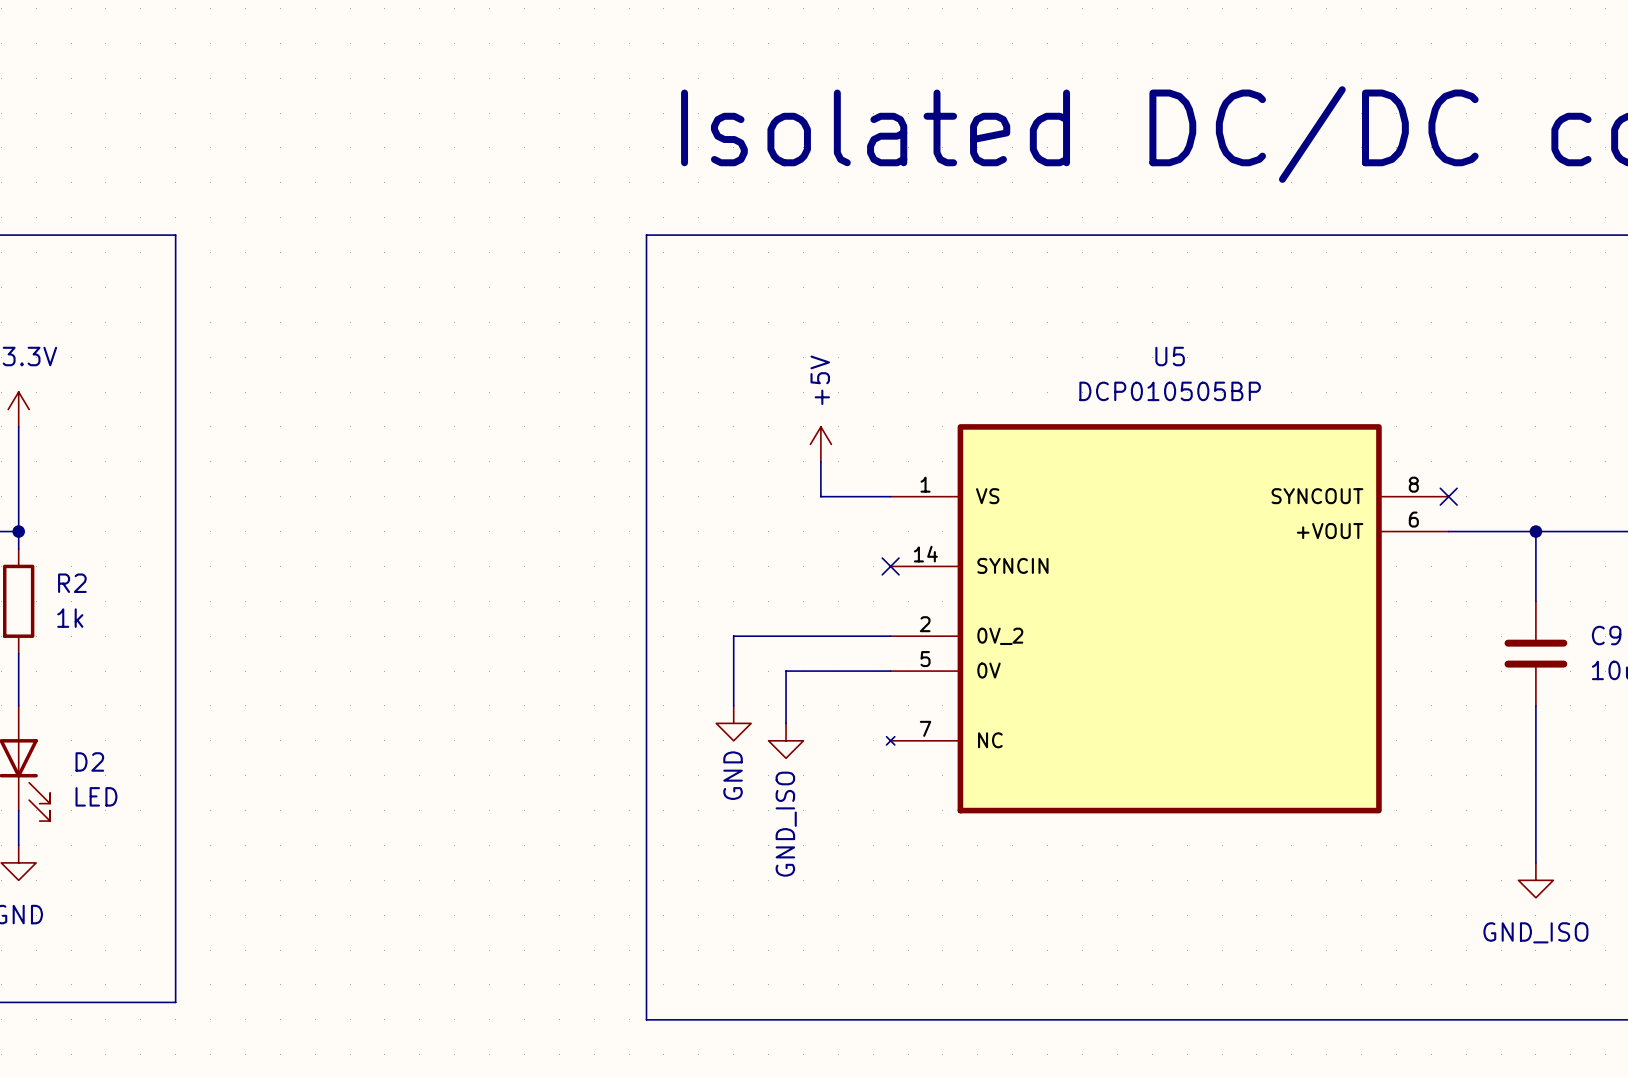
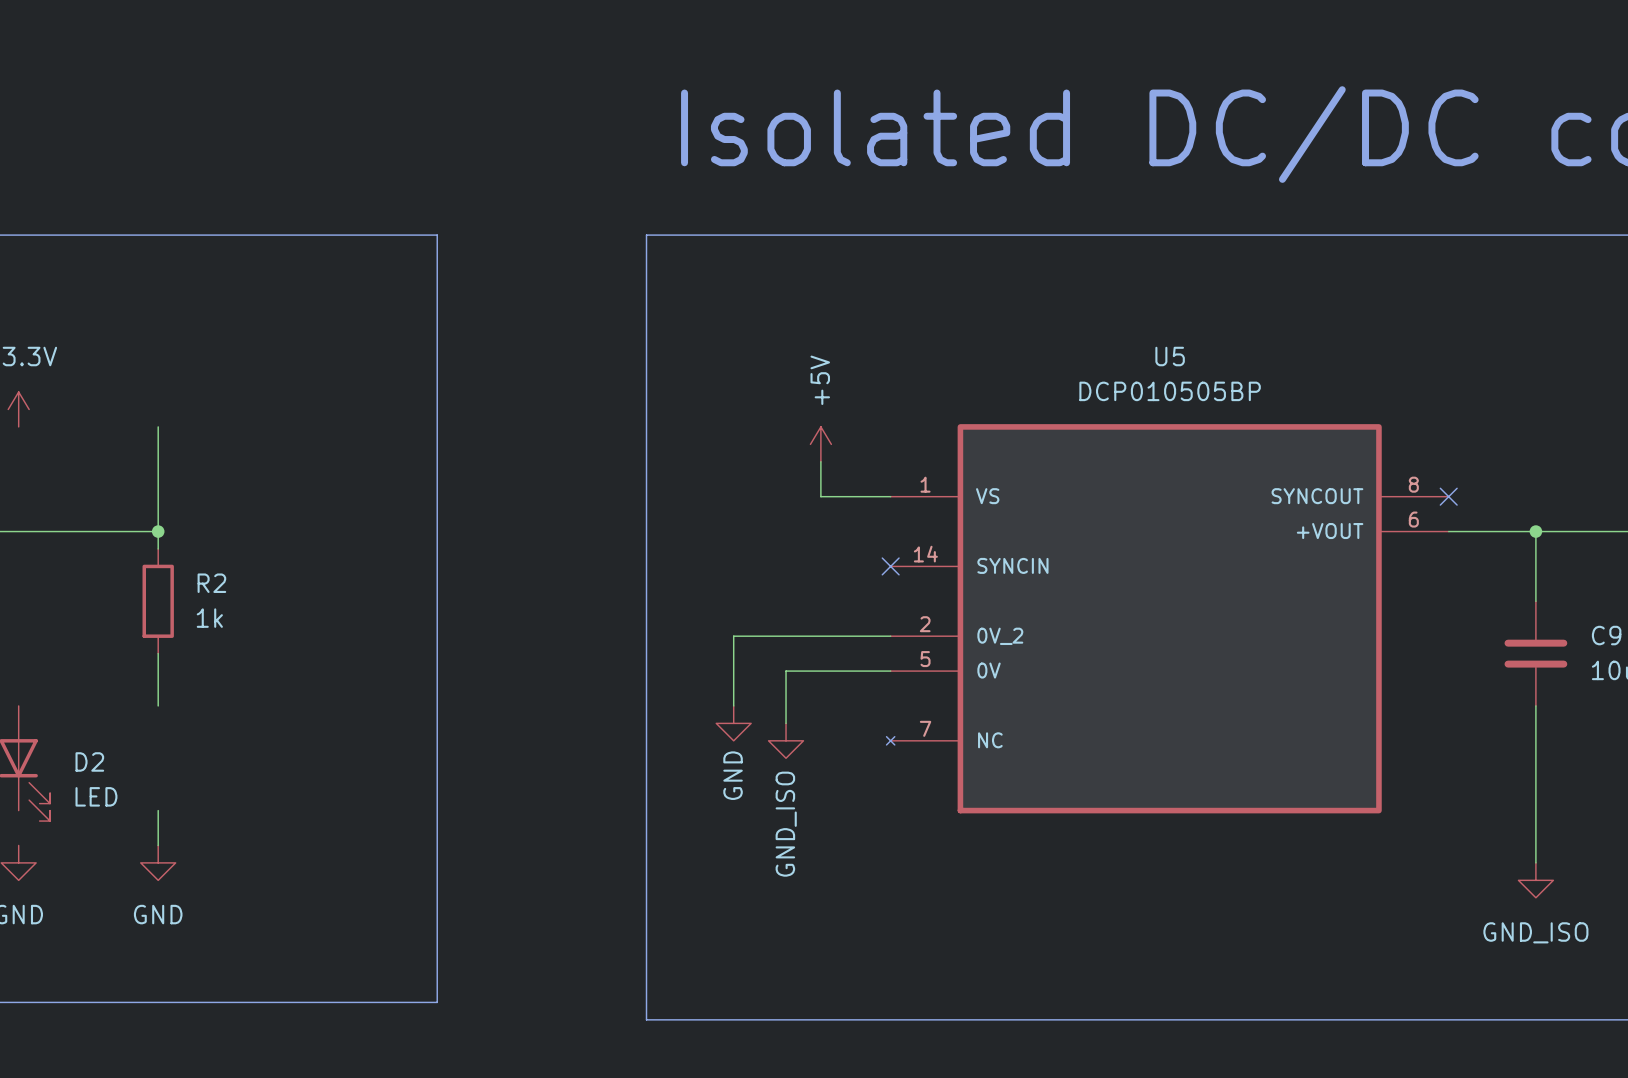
line: (175, 235) (175, 1002) -> (175, 235) (437, 235) (437, 1002) (175, 1002)
wire: (18, 426) (18, 548) -> (158, 426) (158, 548)
wire: none -> (18, 531) (158, 531)
junction: (18, 531) -> none
junction: none -> (158, 531)
R2 position: (18, 601) -> (158, 601)
wire: (18, 653) (18, 705) -> (158, 653) (158, 705)
wire: (18, 810) (18, 845) -> (158, 810) (158, 845)
power symbol: none -> GND (158, 862)

